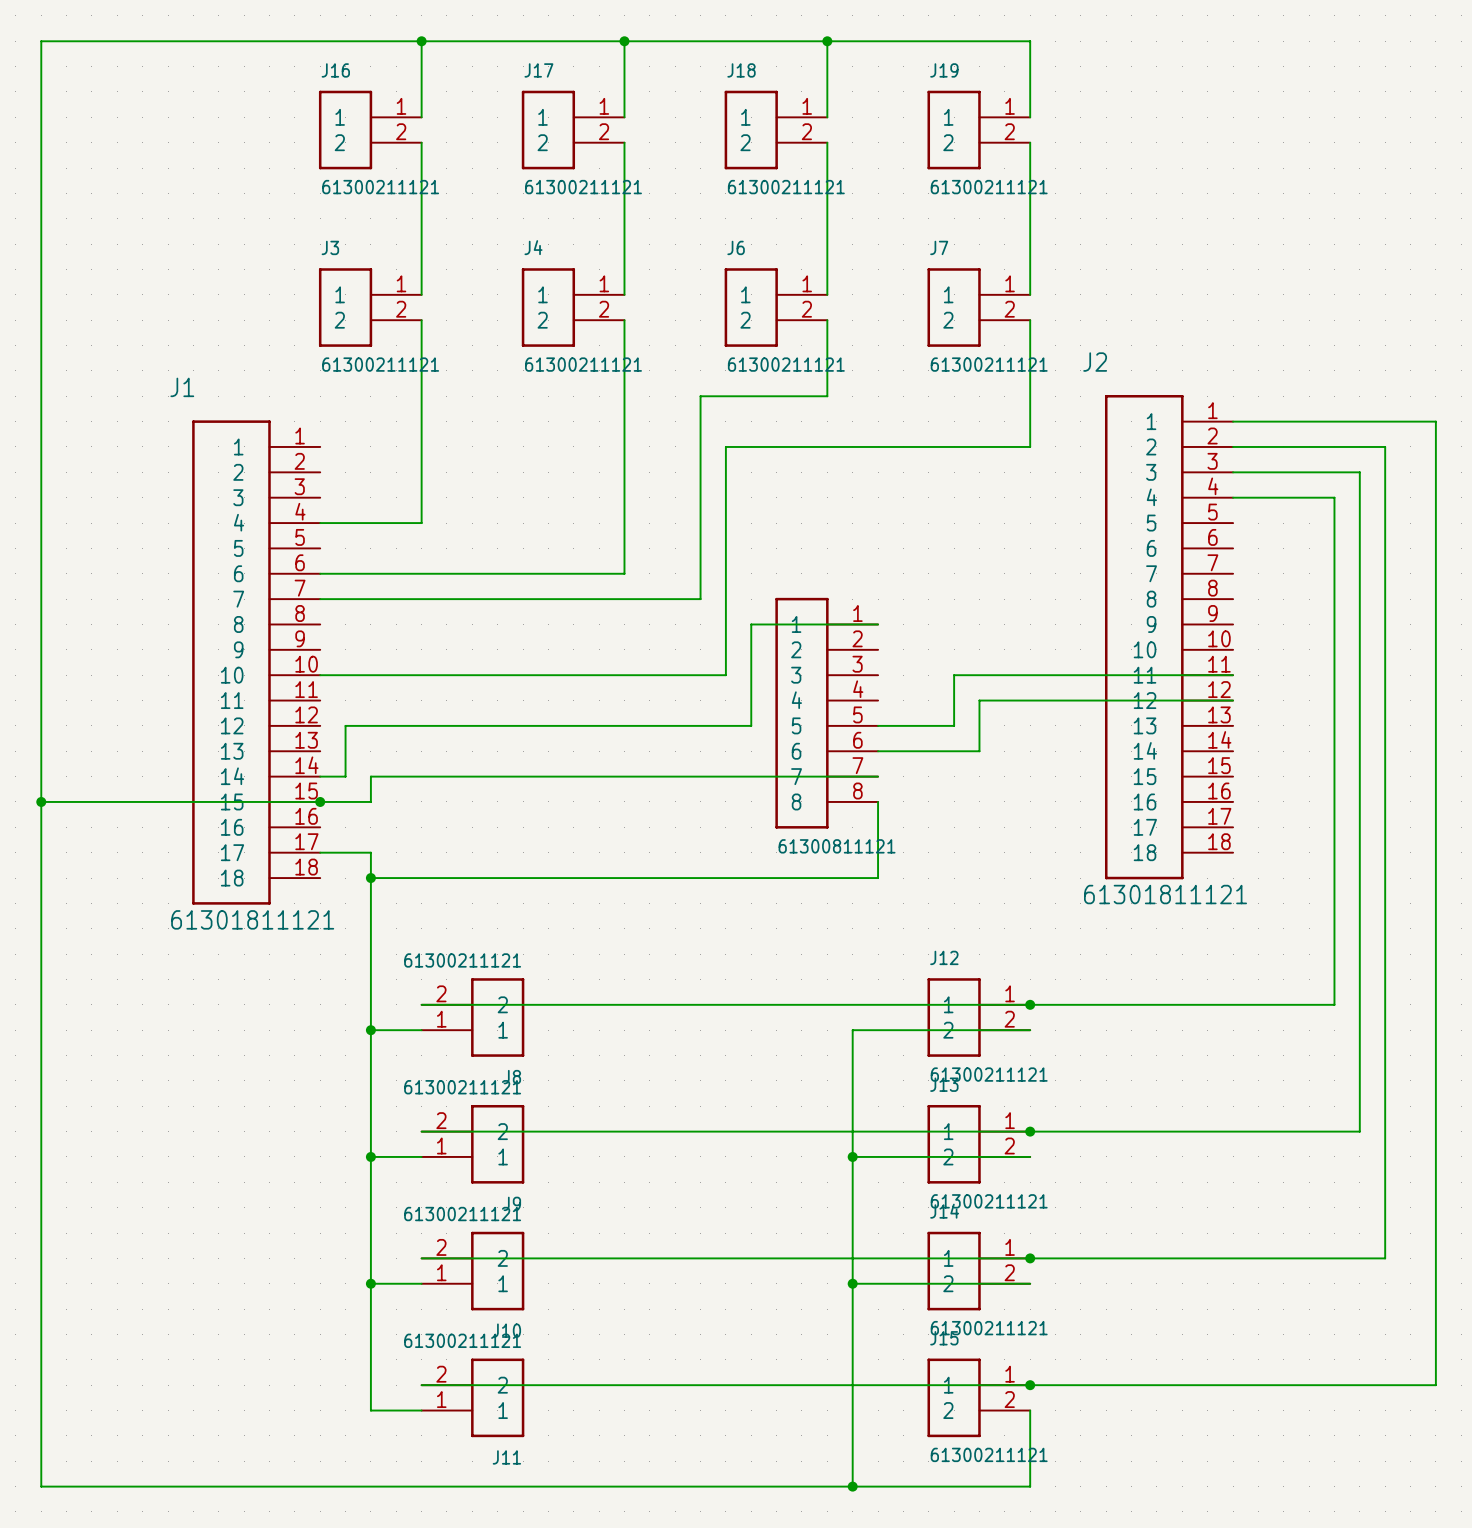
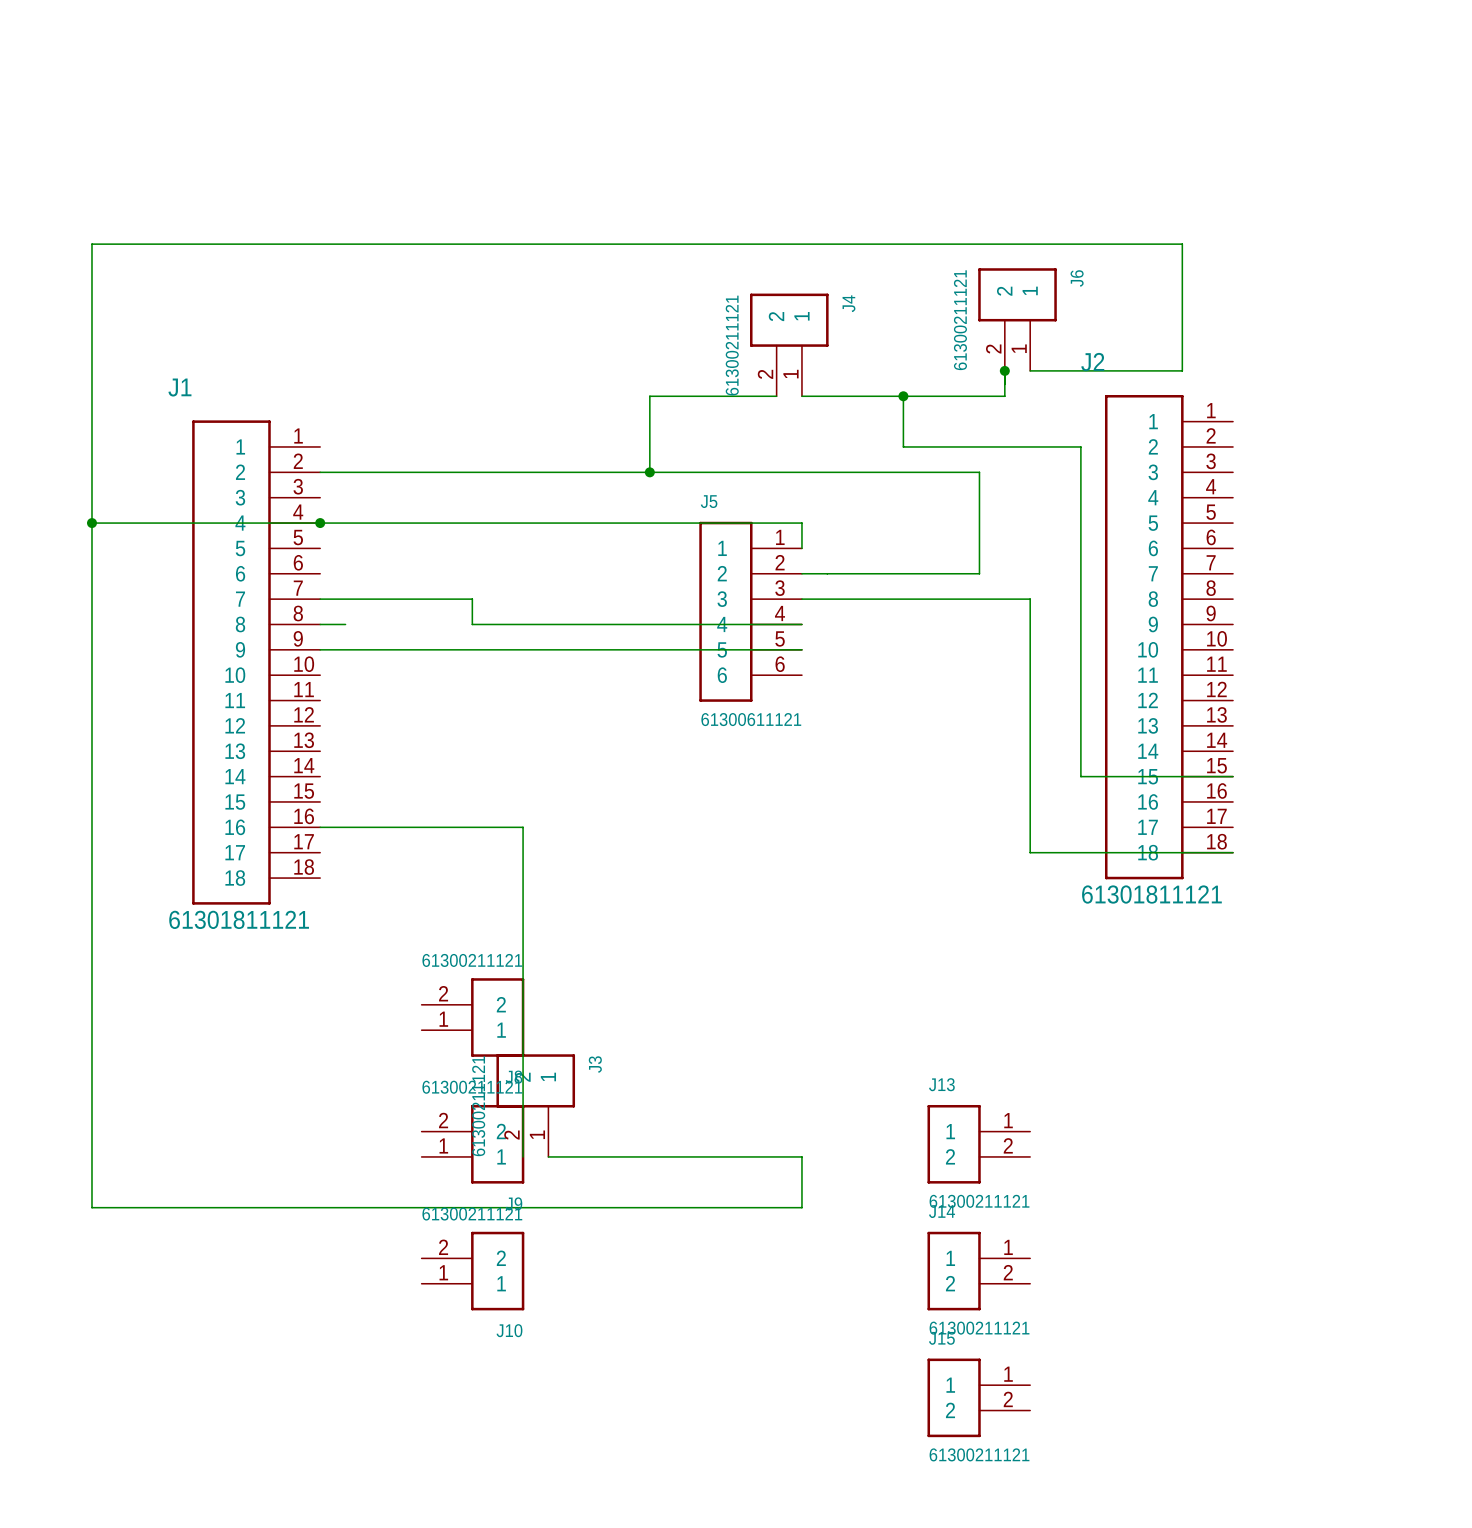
wire: (421, 41) (421, 117) -> none
junction: (421, 41) -> none
wire: (624, 41) (624, 117) -> none
junction: (624, 41) -> none
wire: (827, 41) (827, 117) -> none
junction: (827, 41) -> none
wire: (1030, 117) (1030, 41) (41, 41) (41, 1486) (1030, 1486) (1030, 1410) -> none
J16: 61300211121 (370, 130) -> none
J17: 61300211121 (573, 130) -> none
J18: 61300211121 (775, 130) -> none
J19: 61300211121 (978, 130) -> none
wire: (421, 142) (421, 294) -> none
wire: (624, 142) (624, 294) -> none
wire: (827, 142) (827, 294) -> none
wire: (1030, 142) (1030, 294) -> none
J3 rotation: 0° (345, 307) -> 90° clockwise (535, 1080)
J3 position: (370, 307) -> (535, 1105)
J4 rotation: 0° (548, 307) -> 90° clockwise (789, 320)
J4 position: (573, 307) -> (789, 344)
J6 rotation: 0° (751, 307) -> 90° clockwise (1017, 294)
J6 position: (775, 307) -> (1017, 319)
J7: 61300211121 (978, 307) -> none
wire: (421, 320) (421, 523) -> (801, 548) (801, 523) (421, 523)
wire: (624, 320) (624, 573) (320, 573) -> none
wire: (827, 320) (827, 396) -> (1004, 370) (1004, 396) (827, 396)
wire: (1030, 320) (1030, 446) -> (1233, 776) (1080, 776) (1080, 446) (1030, 446)
junction: none -> (1004, 370)
wire: none -> (1030, 370) (1182, 370) (1182, 244) (91, 244) (91, 1207) (801, 1207) (801, 1156) (548, 1156)
wire: (700, 396) (700, 599) (472, 599) -> (700, 396) (649, 396) (649, 472)
wire: (776, 396) (801, 396) -> none
junction: none -> (903, 396)
wire: (1233, 421) (1435, 421) (1435, 1385) (421, 1385) -> none
wire: (903, 446) (725, 446) (725, 675) (320, 675) -> (903, 446) (903, 396)
wire: (1233, 446) (1385, 446) (1385, 1258) (421, 1258) -> none
wire: none -> (320, 472) (979, 472) (979, 573) (801, 573)
junction: none -> (649, 472)
wire: (1233, 472) (1359, 472) (1359, 1131) (421, 1131) -> none
wire: (1233, 497) (1334, 497) (1334, 1004) (421, 1004) -> none
wire: none -> (91, 523) (320, 523)
junction: none -> (91, 523)
junction: none -> (320, 523)
wire: none -> (801, 599) (1030, 599) (1030, 852) (1233, 852)
J5: none -> 61300611121 (750, 611)
wire: none -> (320, 624) (345, 624)
wire: (751, 624) (751, 725) (345, 725) (345, 776) (320, 776) -> (751, 624) (472, 624) (472, 599)
wire: (801, 624) (878, 624) -> none
wire: none -> (320, 649) (801, 649)
wire: (1233, 675) (954, 675) (954, 725) (878, 725) -> none
wire: (1233, 700) (979, 700) (979, 751) (878, 751) -> none
part: 61300811121 (826, 713) -> none
wire: (878, 776) (370, 776) (370, 801) (41, 801) -> none
junction: (41, 801) -> none
junction: (320, 801) -> none
wire: (878, 801) (878, 878) (370, 878) -> none
wire: none -> (320, 827) (523, 827) (523, 1156)
wire: (320, 852) (370, 852) (370, 1410) (421, 1410) -> none
junction: (370, 878) -> none
junction: (1030, 1004) -> none
J12: 61300211121 (978, 1017) -> none
wire: (370, 1030) (421, 1030) -> none
junction: (370, 1030) -> none
wire: (1030, 1030) (852, 1030) (852, 1486) -> none
junction: (1030, 1131) -> none
wire: (370, 1156) (421, 1156) -> none
junction: (370, 1156) -> none
wire: (852, 1156) (1030, 1156) -> none
junction: (852, 1156) -> none
junction: (1030, 1258) -> none
wire: (370, 1283) (421, 1283) -> none
junction: (370, 1283) -> none
wire: (852, 1283) (1030, 1283) -> none
junction: (852, 1283) -> none
junction: (1030, 1385) -> none
J11: 61300211121 (472, 1397) -> none
junction: (852, 1486) -> none

